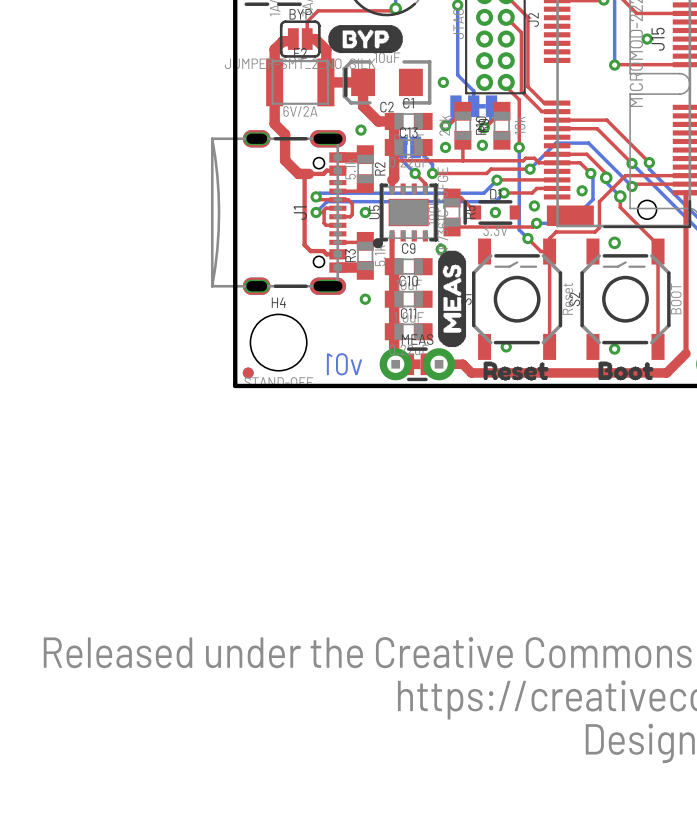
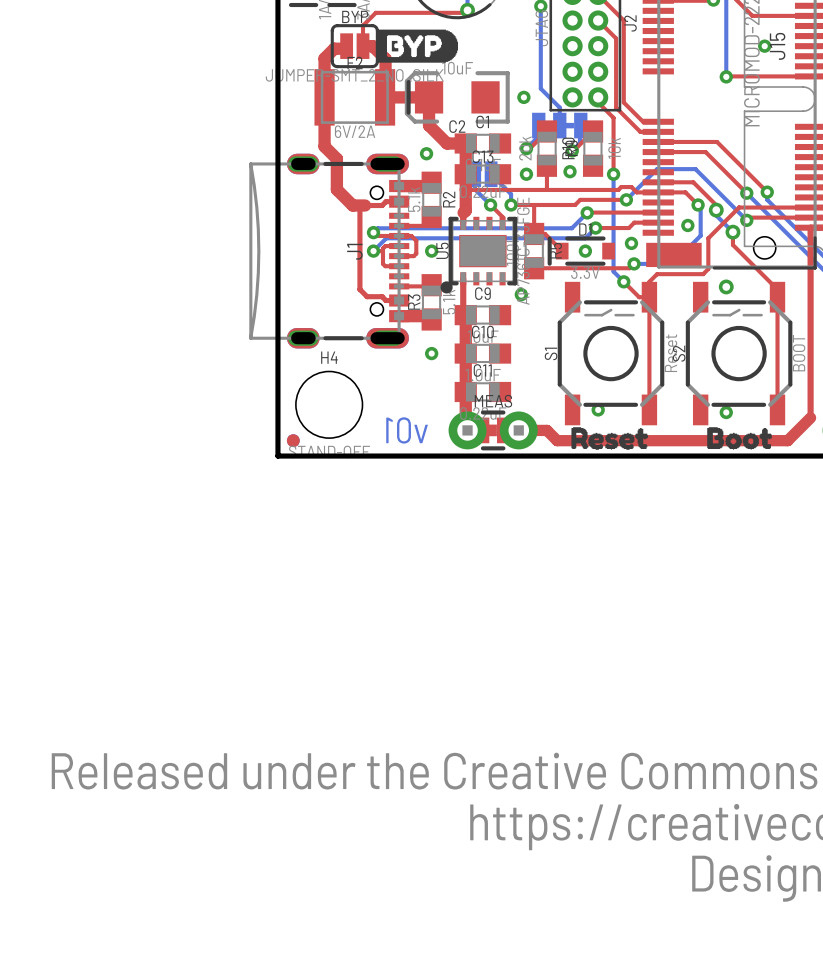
drawing shape: [328, 25, 403, 54] -> [378, 29, 458, 63]
top track: none -> (534, 204) (534, 233)
drawing: [438, 250, 467, 348] -> none

